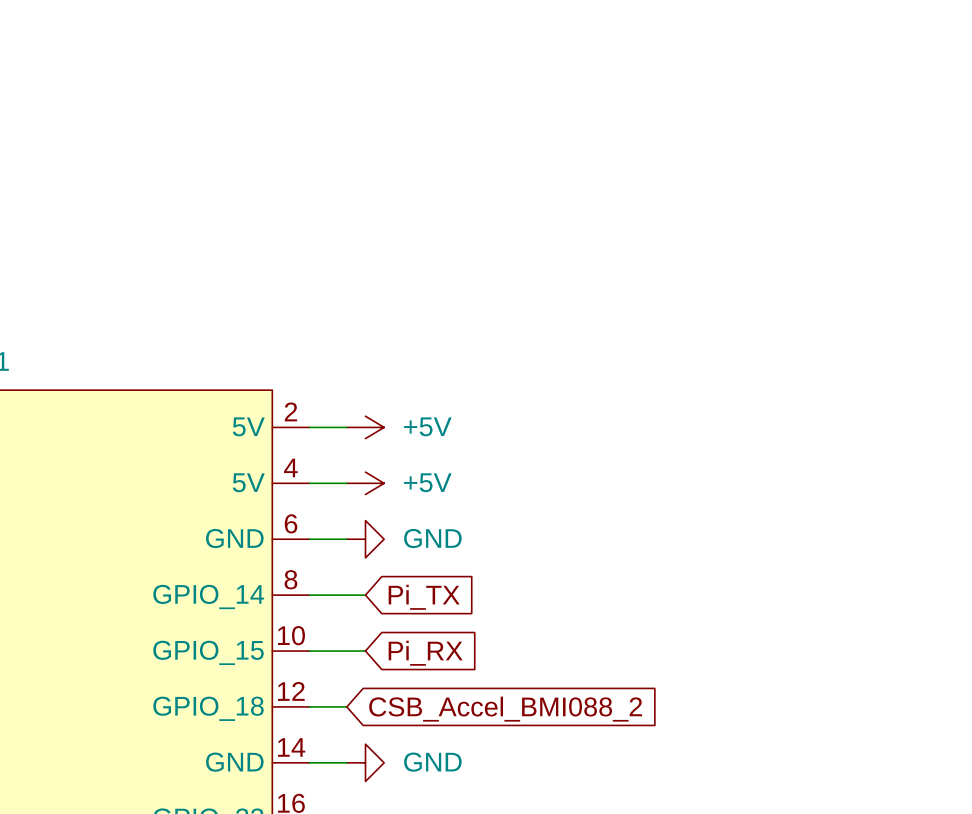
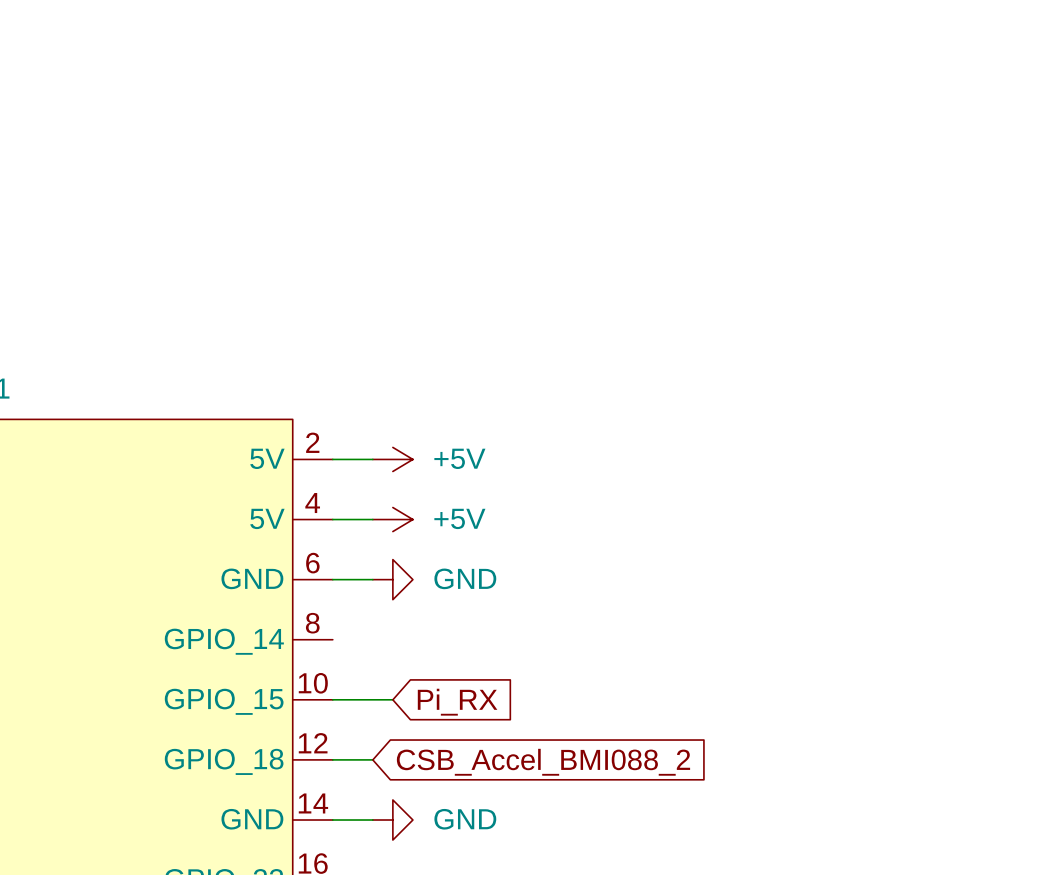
wire: (309, 595) (365, 595) -> none
global label: Pi_TX (424, 597) -> none

